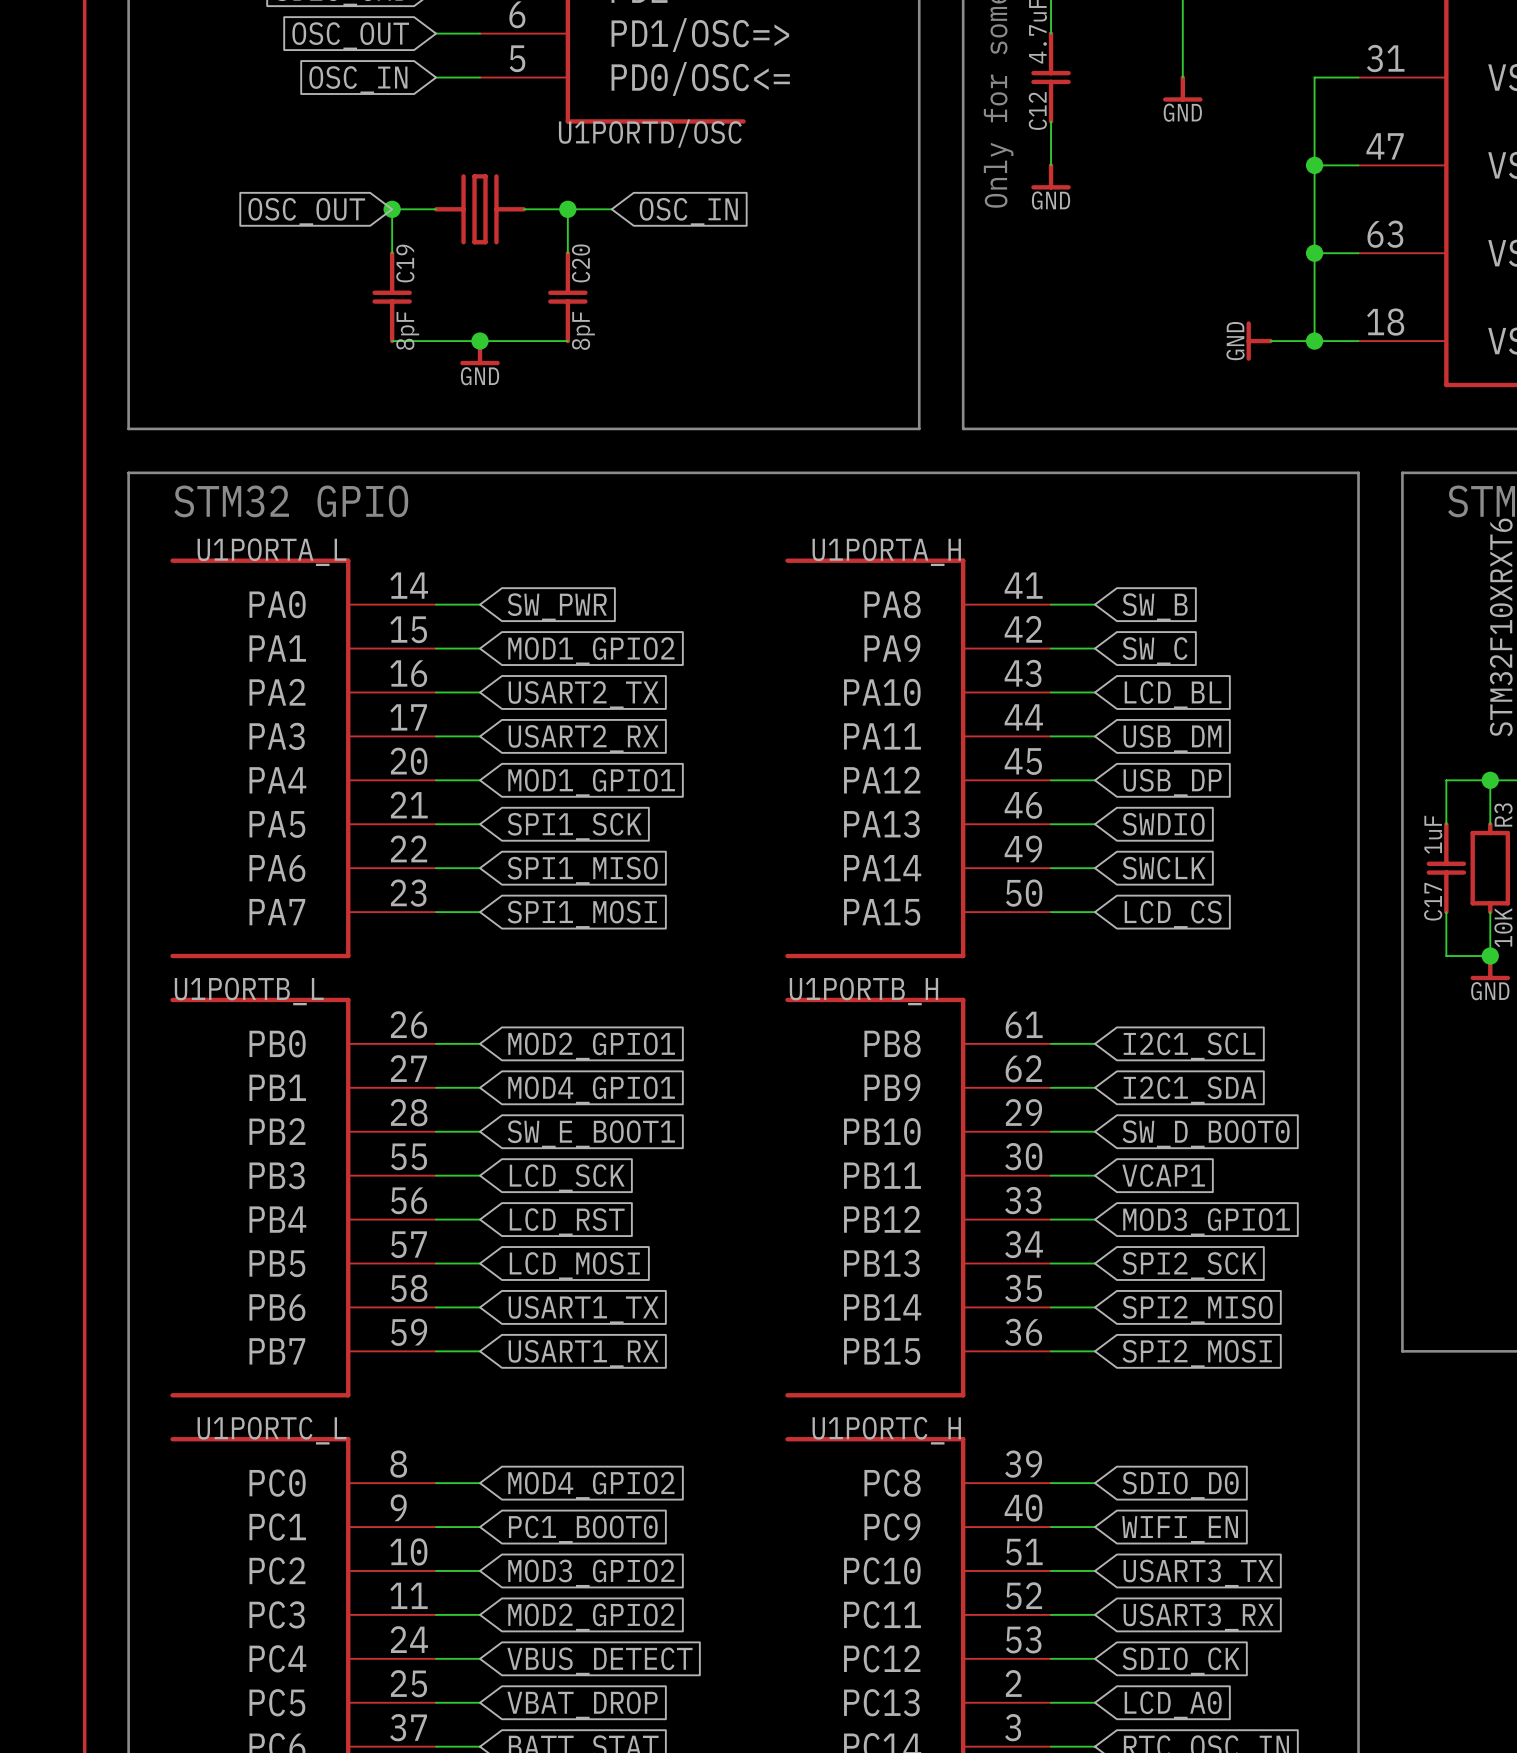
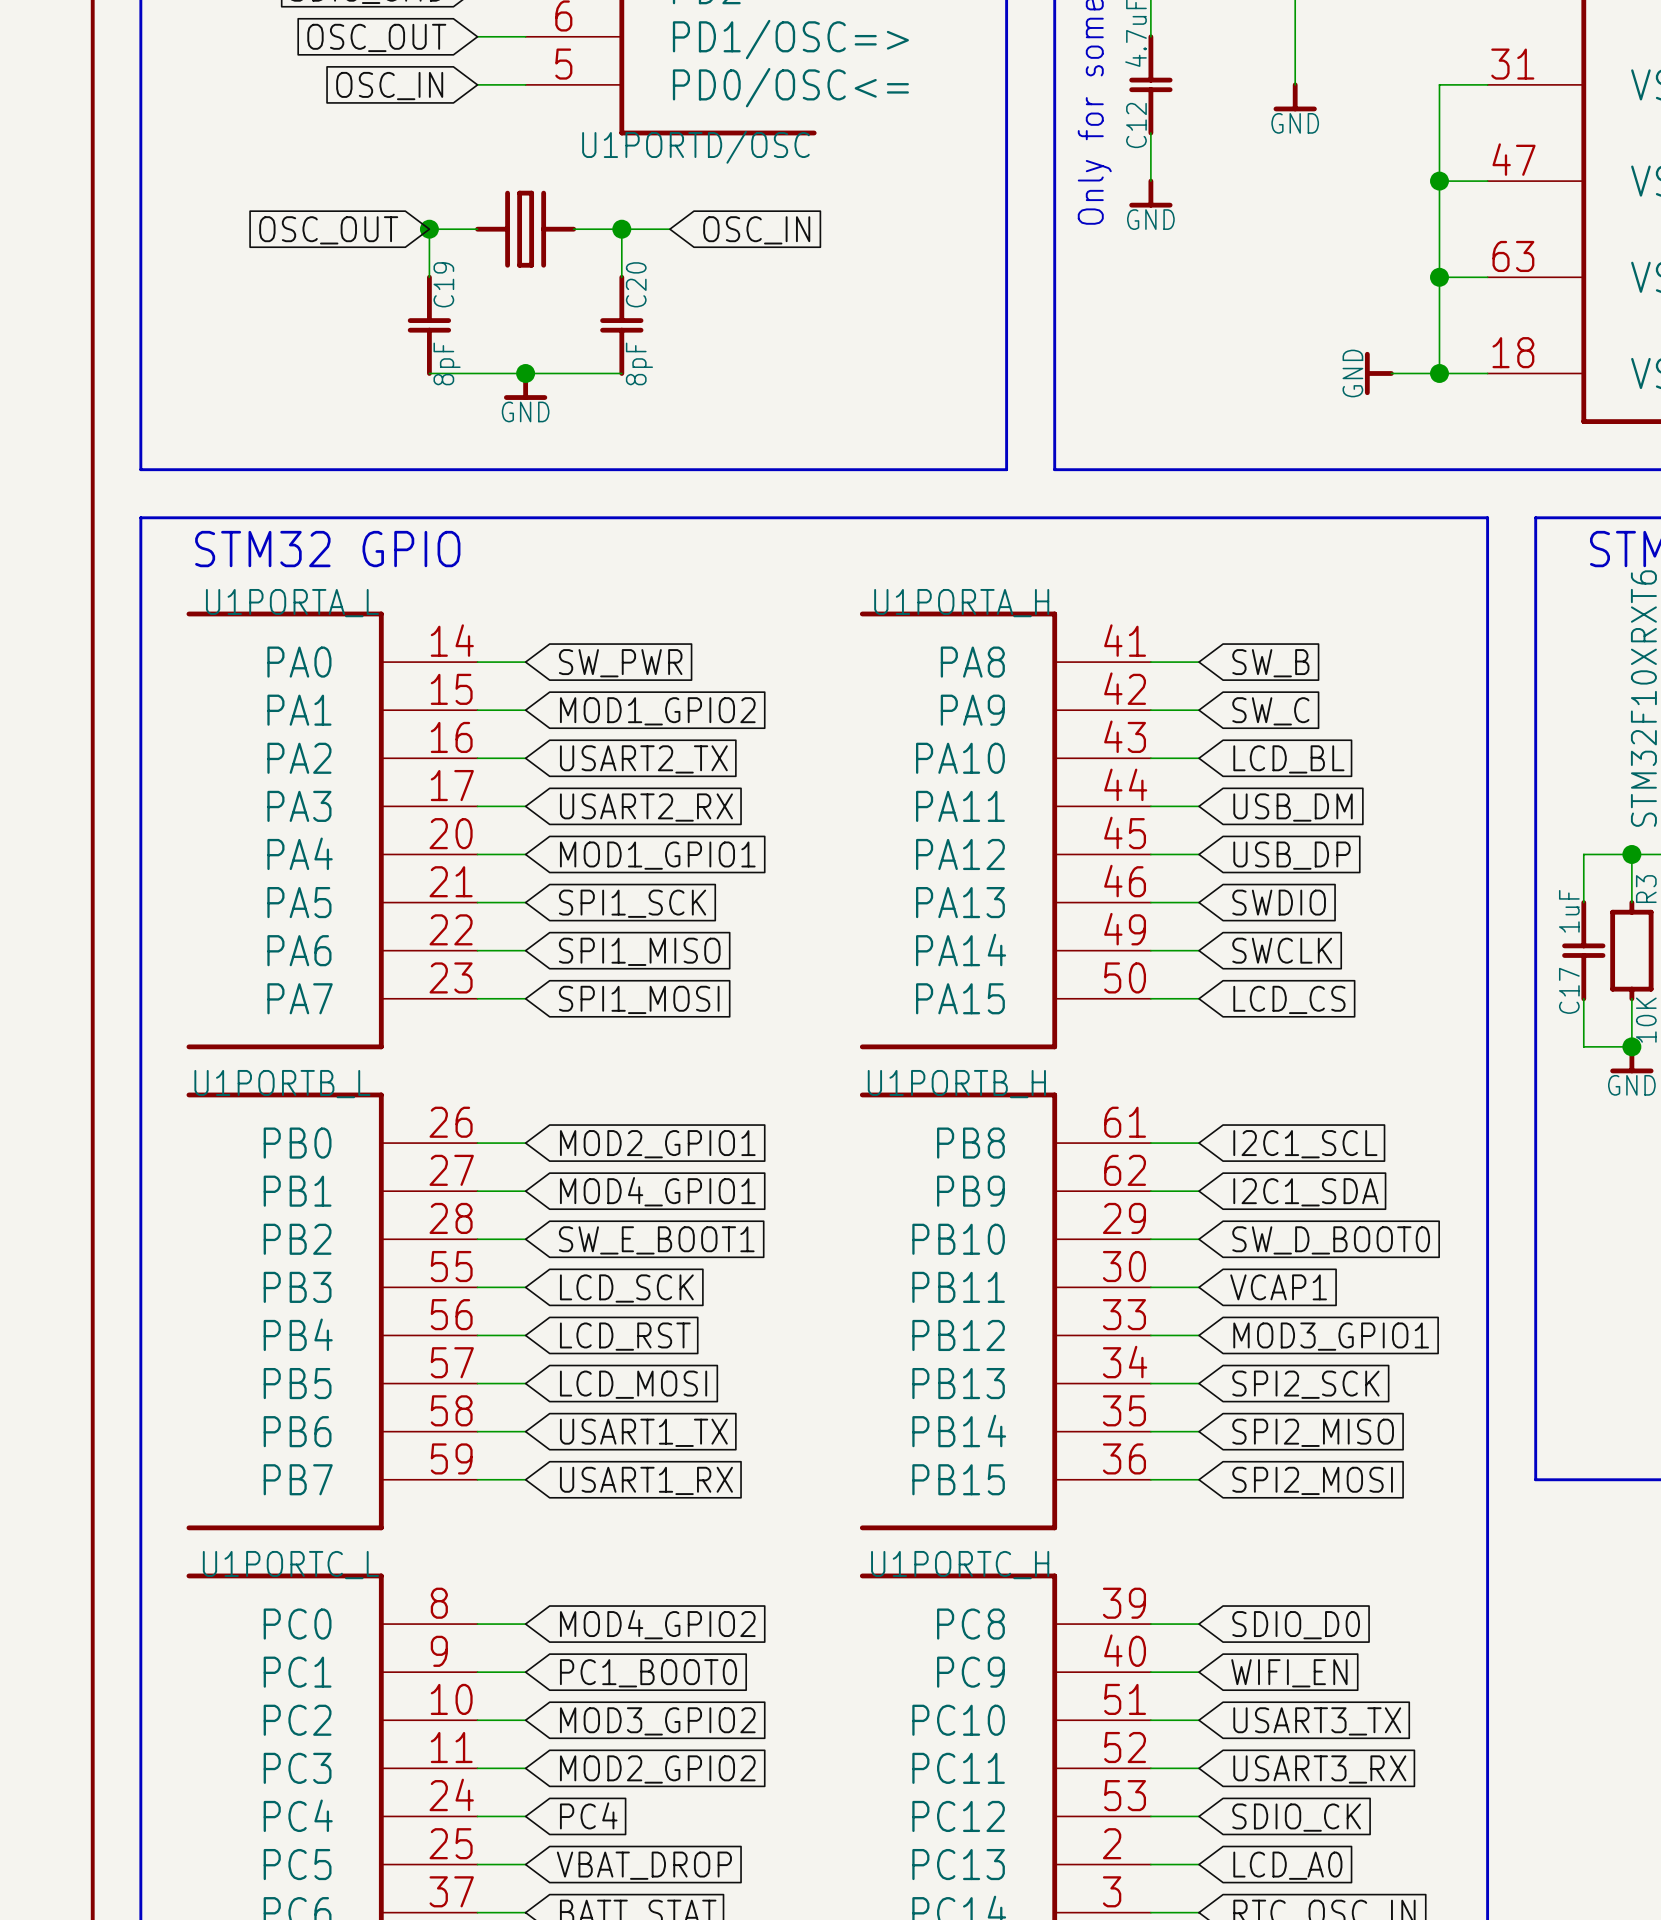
global label: VBUS_DETECT (599, 1661) -> PC4 (588, 1815)

